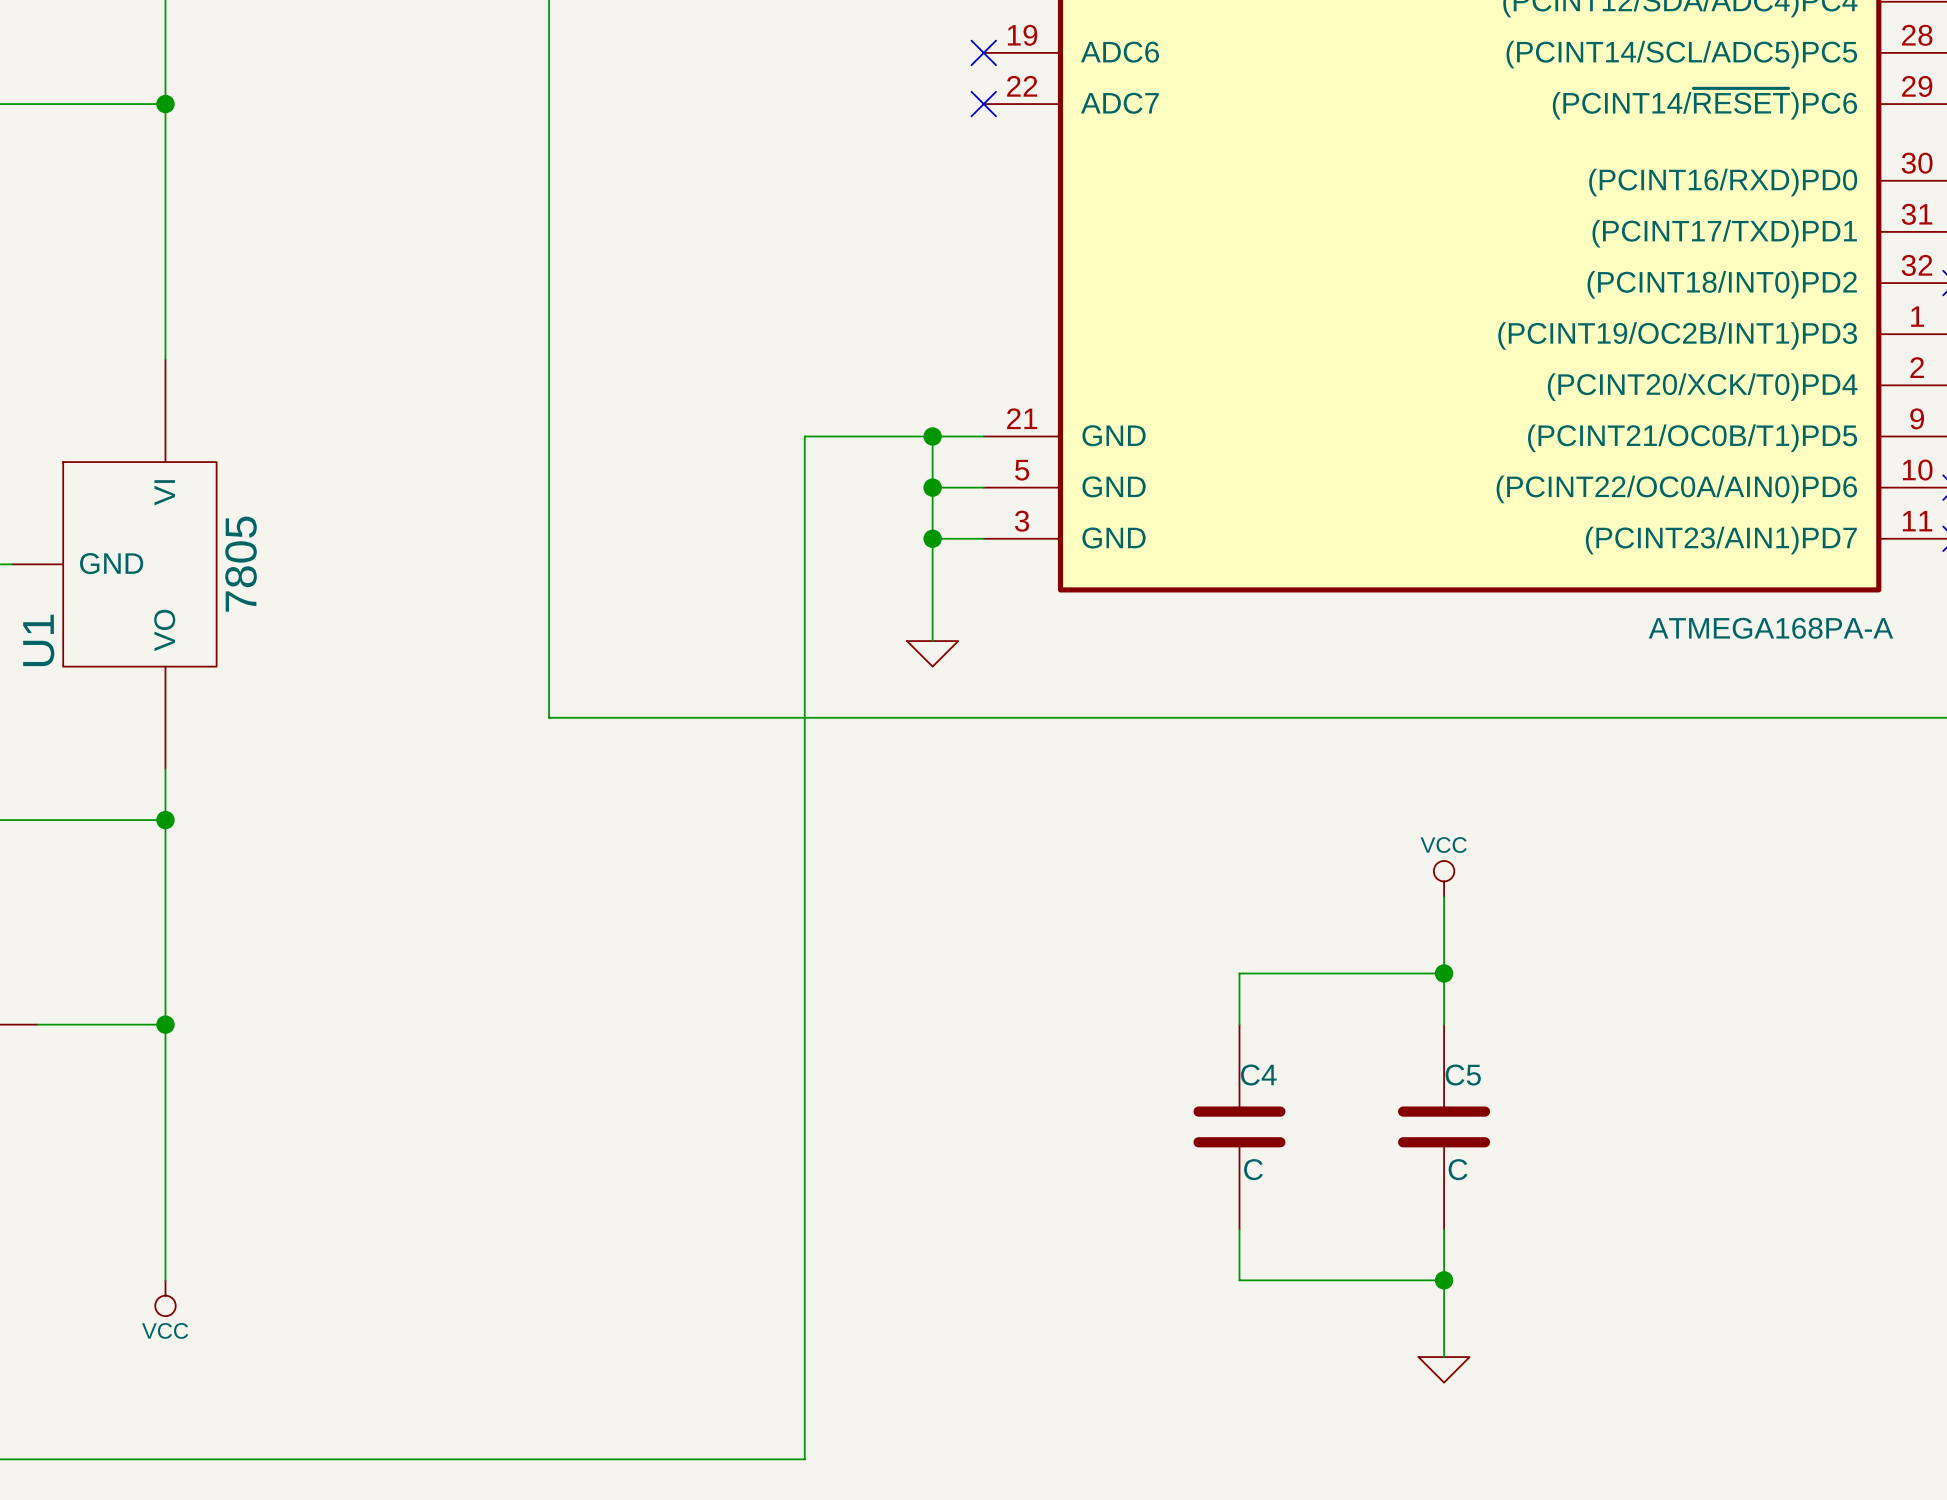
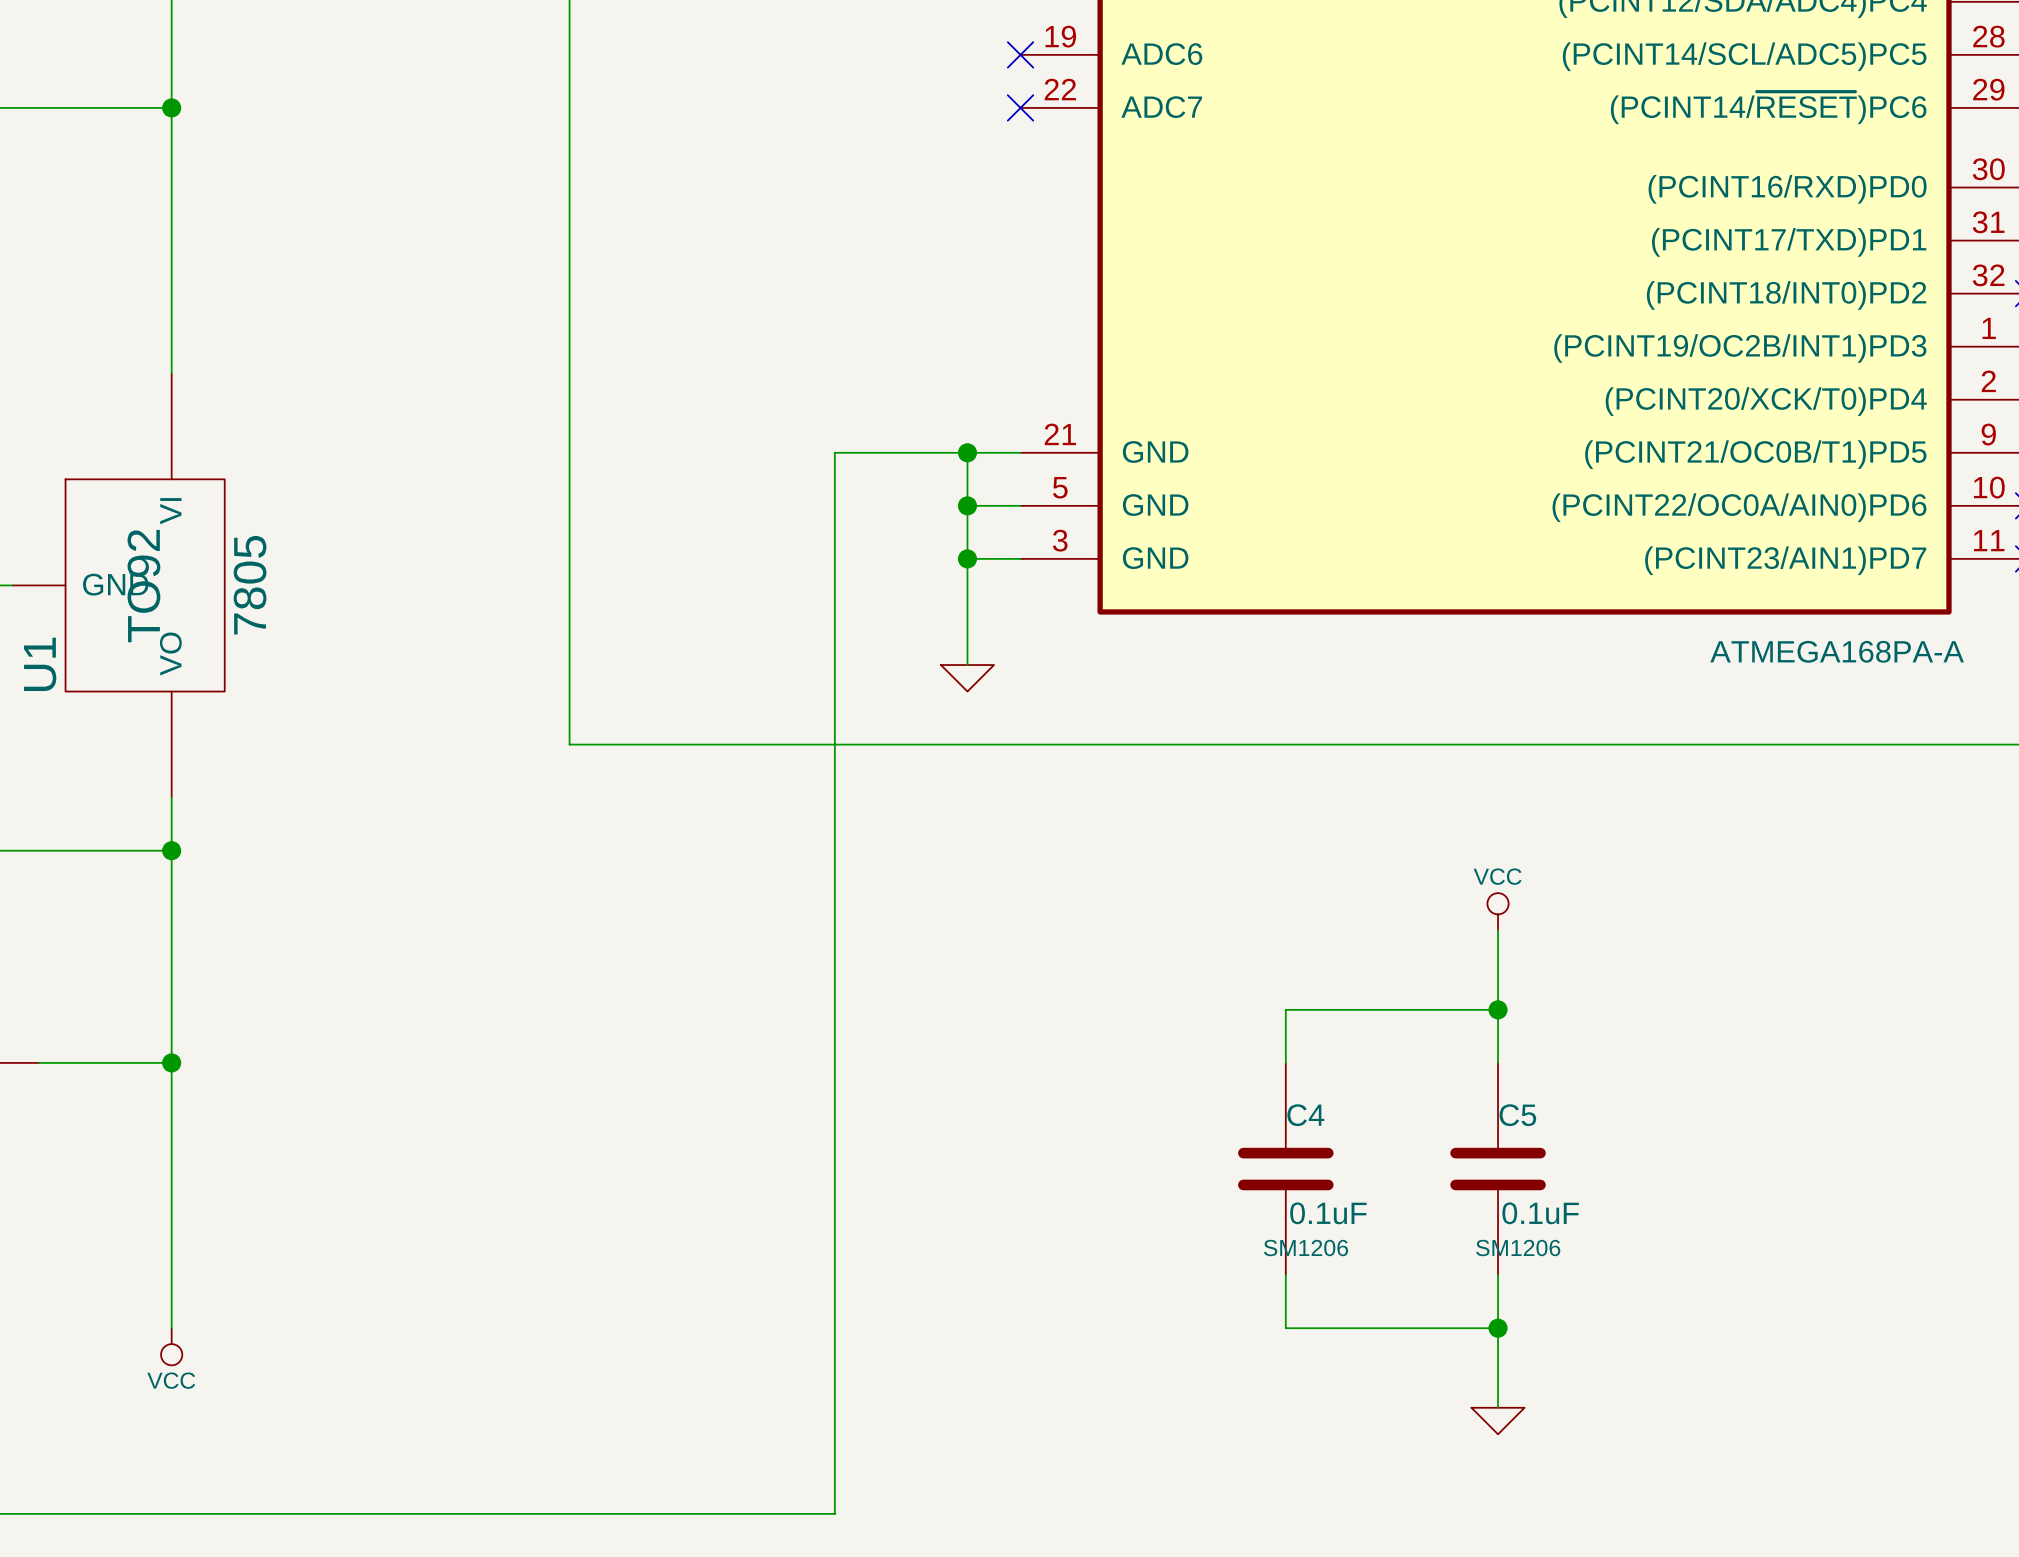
U1 text: none -> TO92 (143, 586)
C4 value: C (1253, 1169) -> 0.1uF (1328, 1213)
C5 value: C (1458, 1169) -> 0.1uF (1540, 1213)
C4 text: none -> SM1206 (1305, 1248)
C5 text: none -> SM1206 (1518, 1248)

